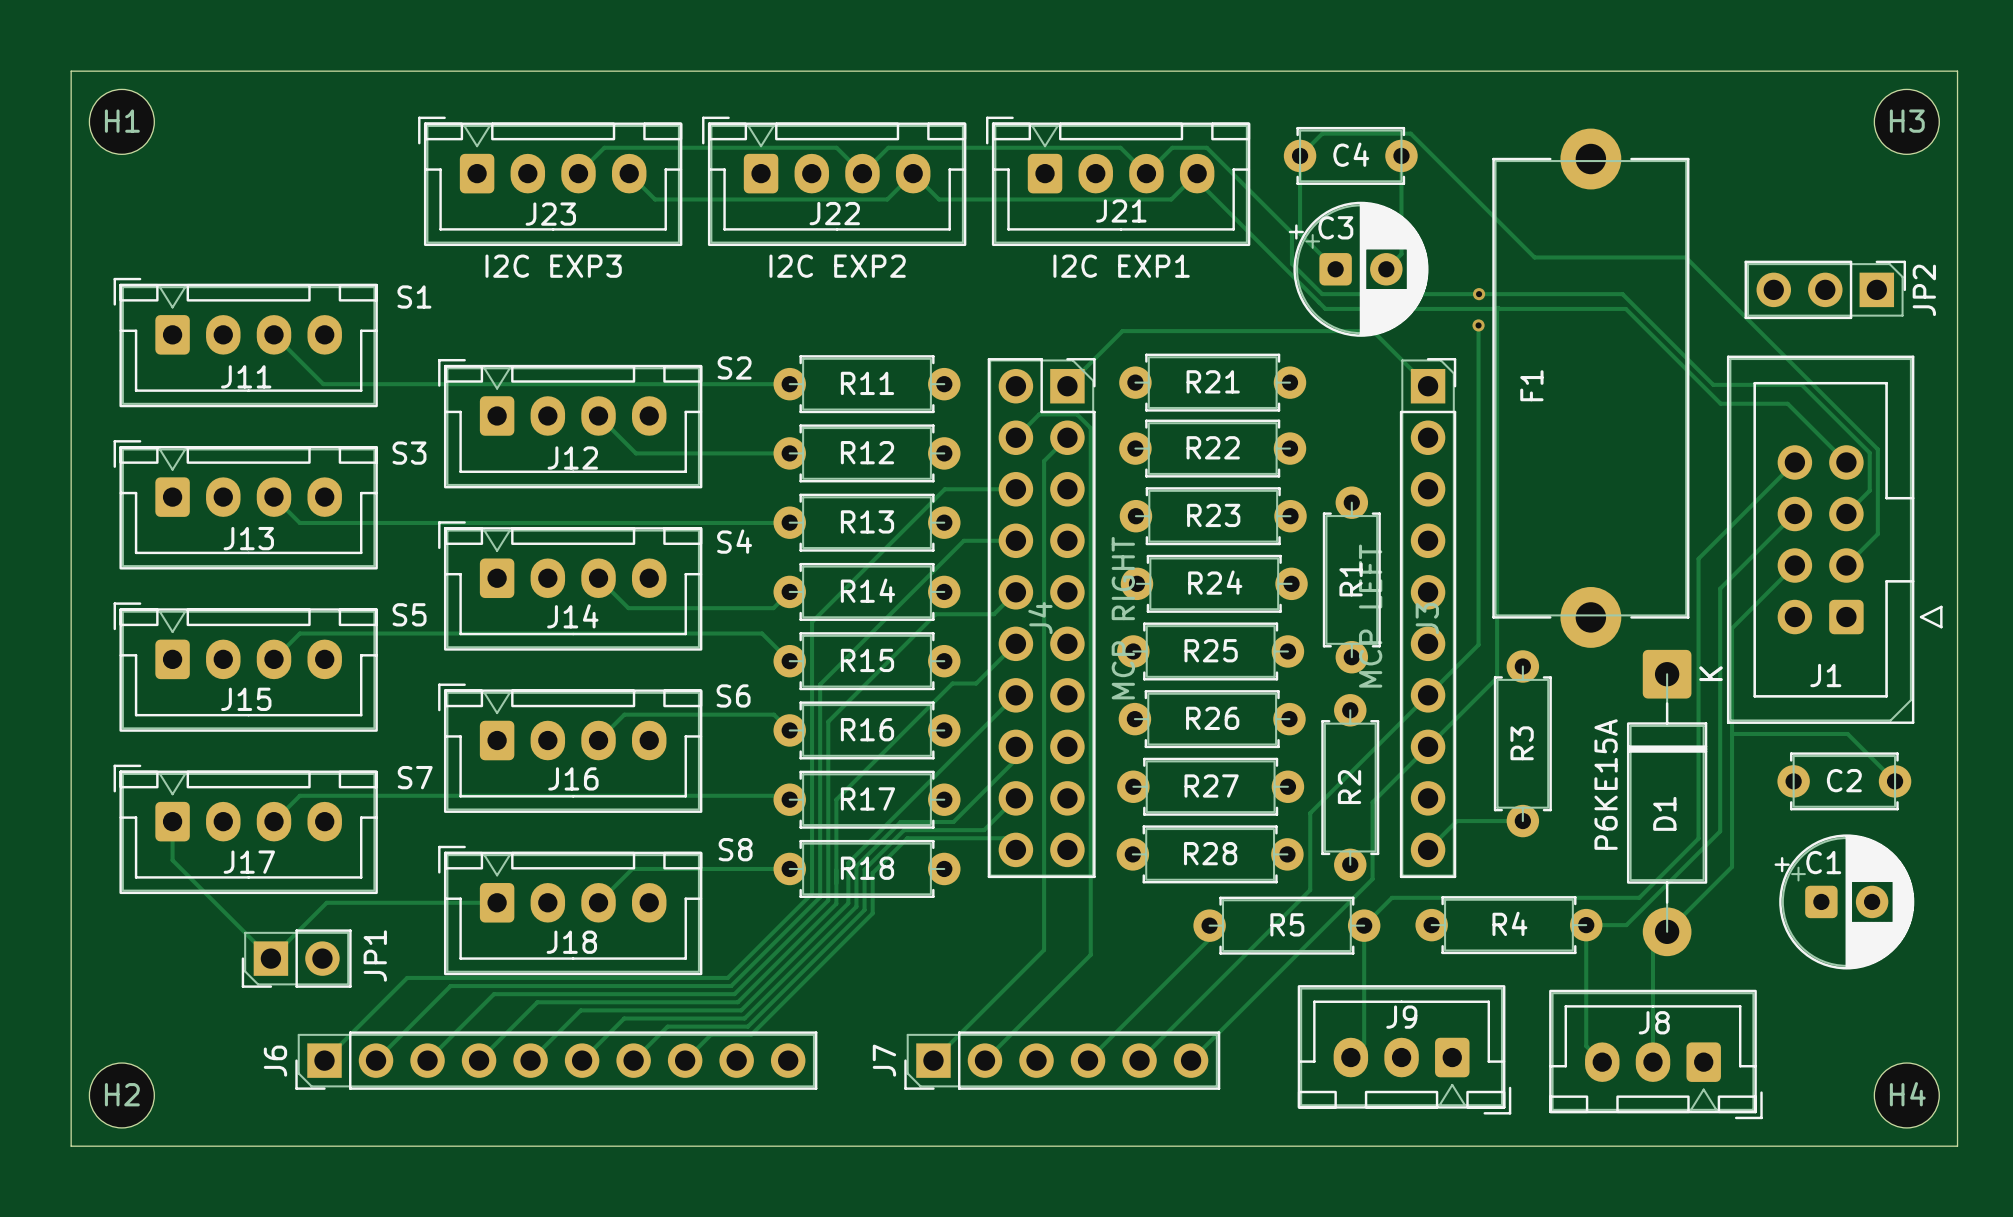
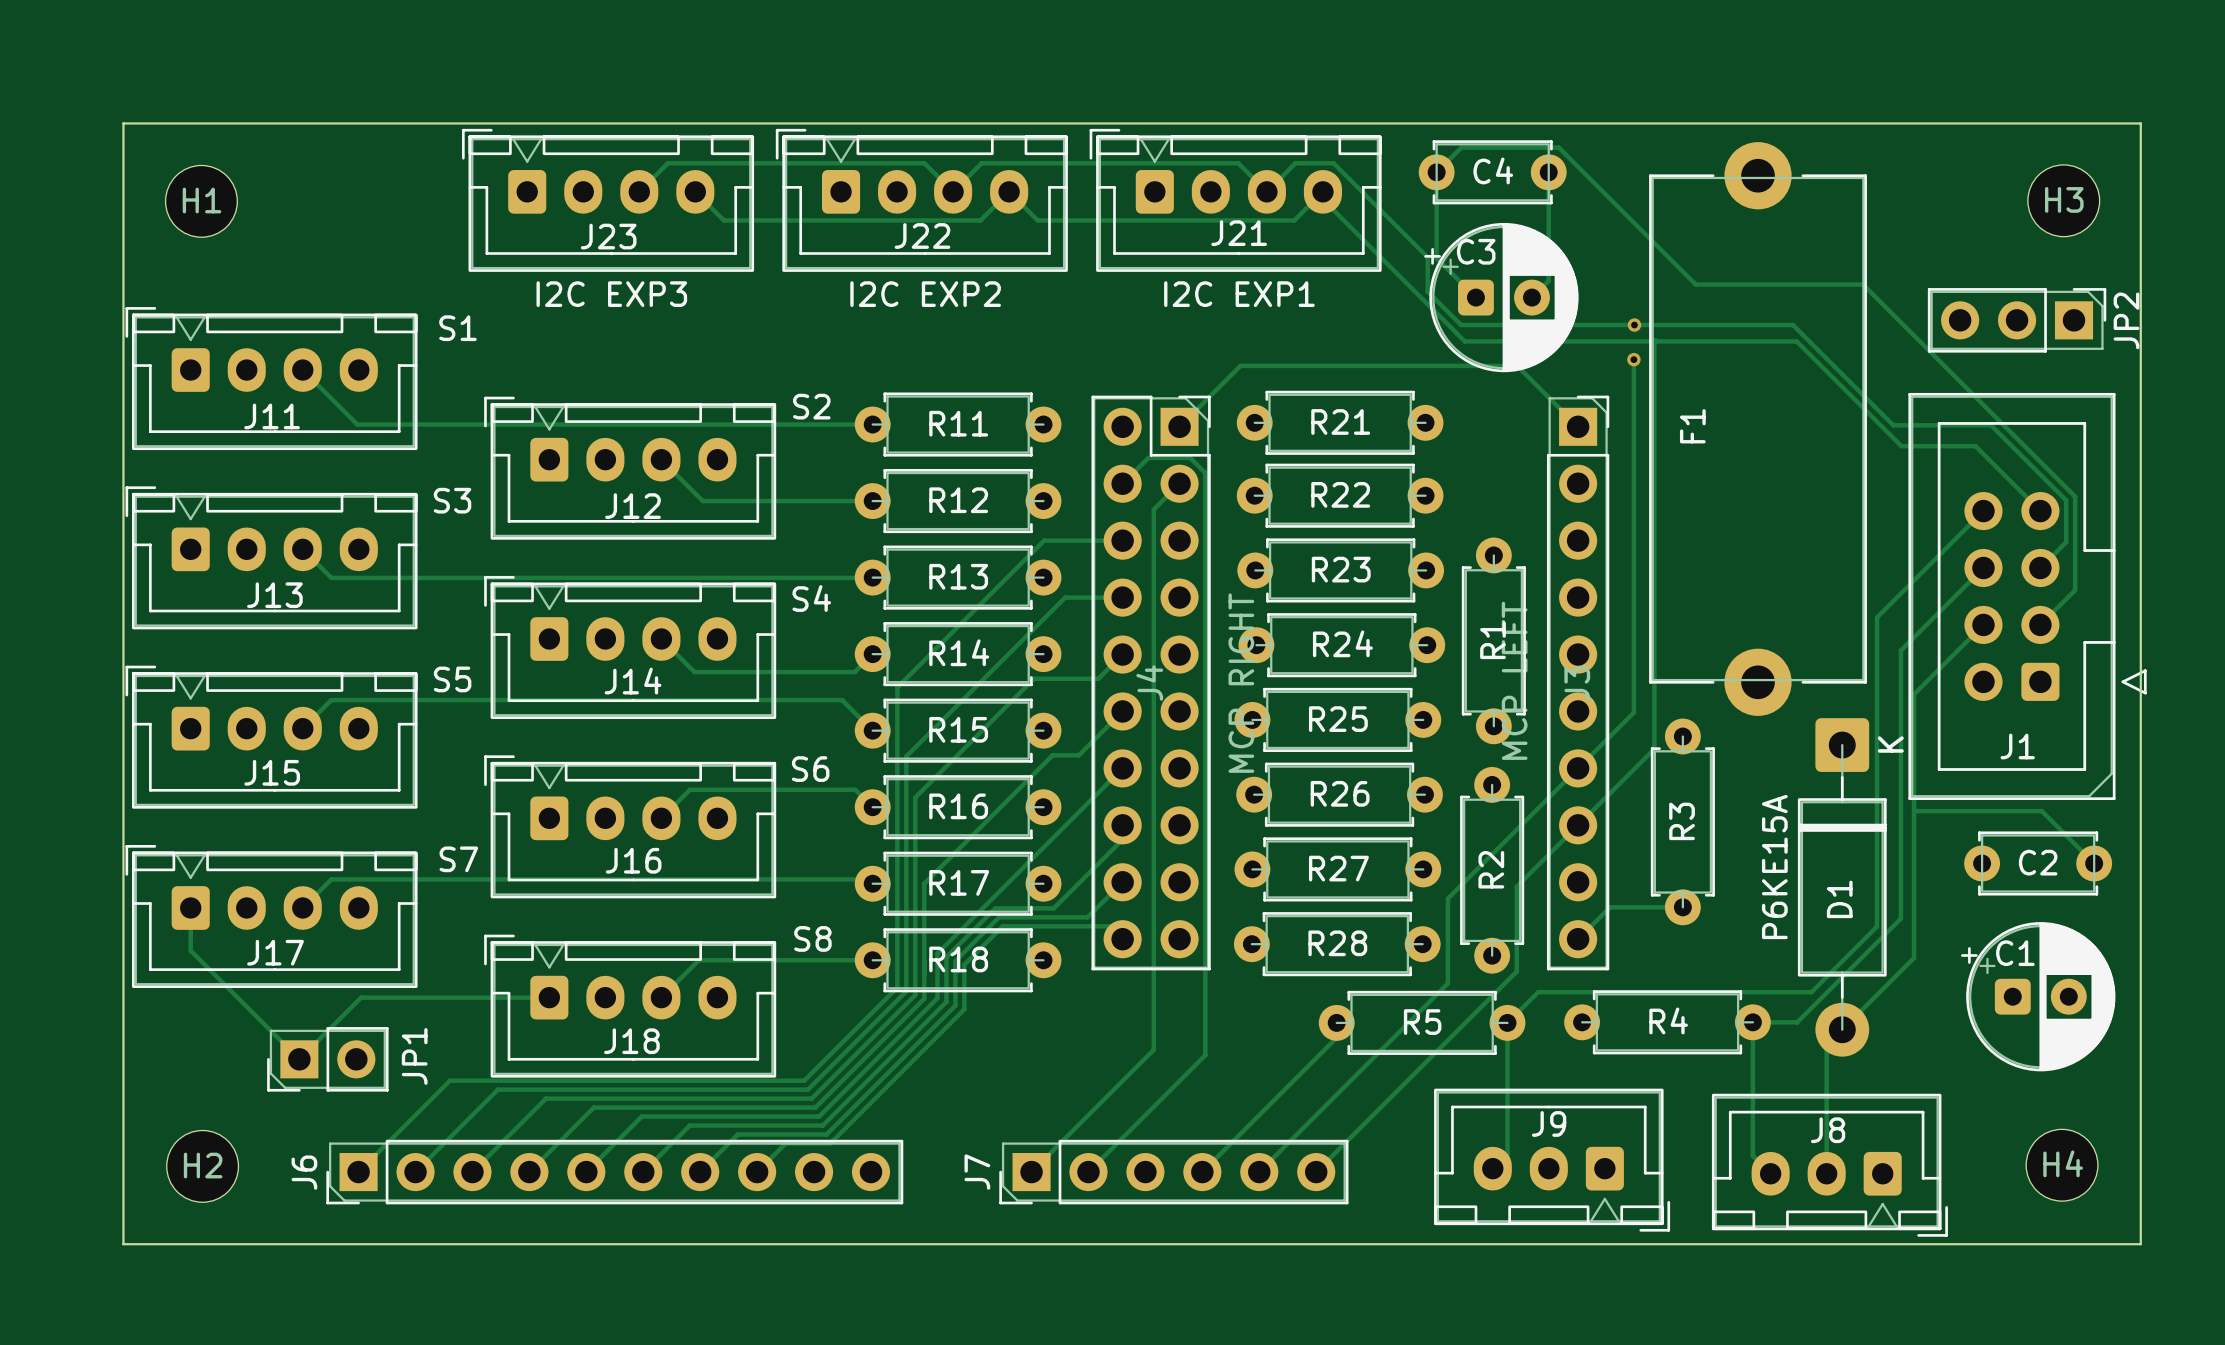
board edge: (71, 71) (1957, 71) (1957, 1146) (71, 1146) (71, 71) -> (123, 123) (123, 1244) (2140, 1244) (2140, 123) (123, 123)
H1 position: (121, 121) -> (201, 201)
H3 position: (1906, 121) -> (2063, 200)
H2 position: (121, 1095) -> (202, 1166)
H4 position: (1906, 1095) -> (2062, 1165)

